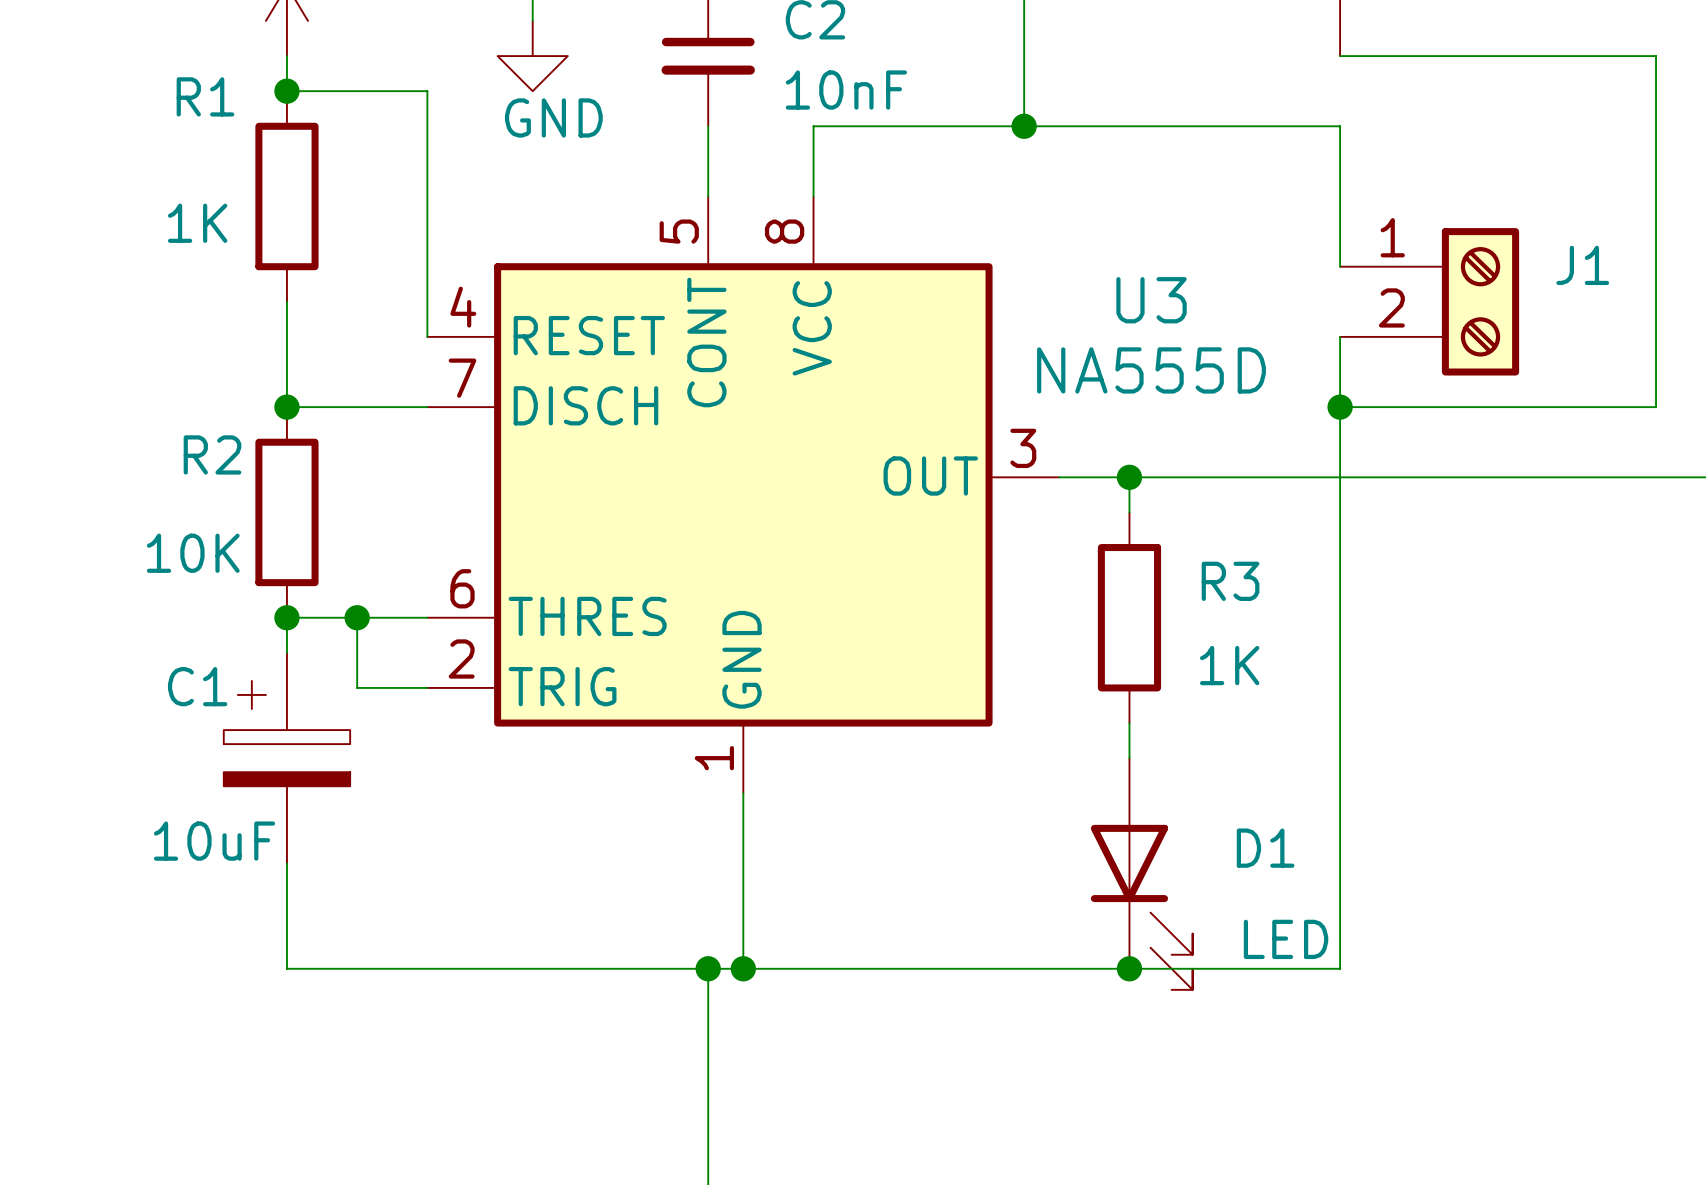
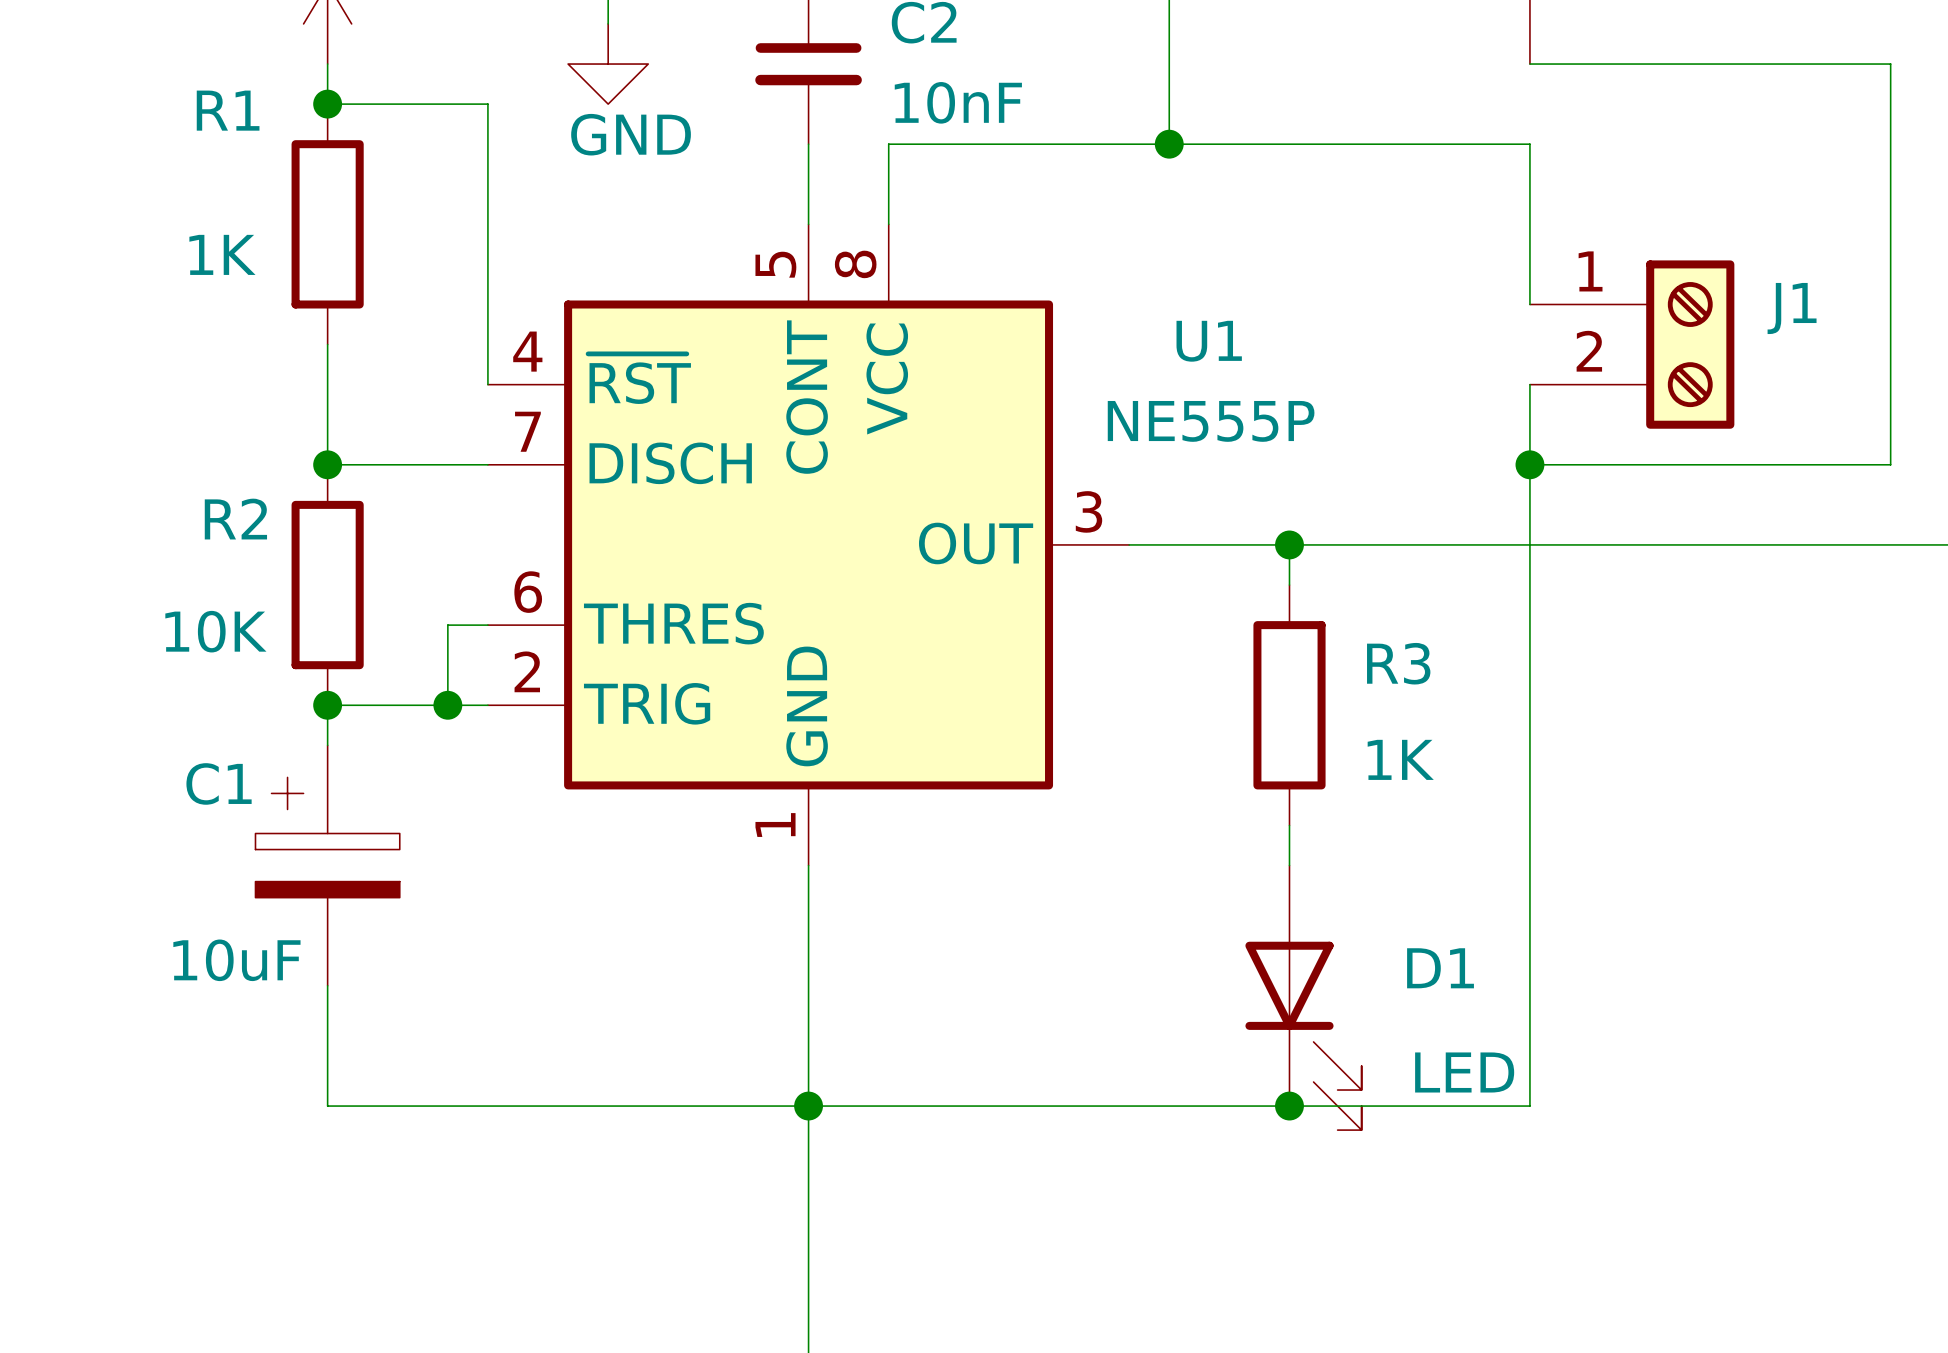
wire: (813, 126) (813, 196) -> (928, 144) (888, 144) (888, 224)
U1: none -> NE555P (808, 544)
U3: NA555D (743, 494) -> none
wire: none -> (487, 625) (447, 625) (447, 705)
wire: (357, 617) (357, 687) (427, 687) -> none
junction position: (357, 617) -> (447, 705)
wire: none -> (808, 865) (808, 1106)
wire: (743, 793) (743, 968) -> none
junction: (743, 968) -> none

